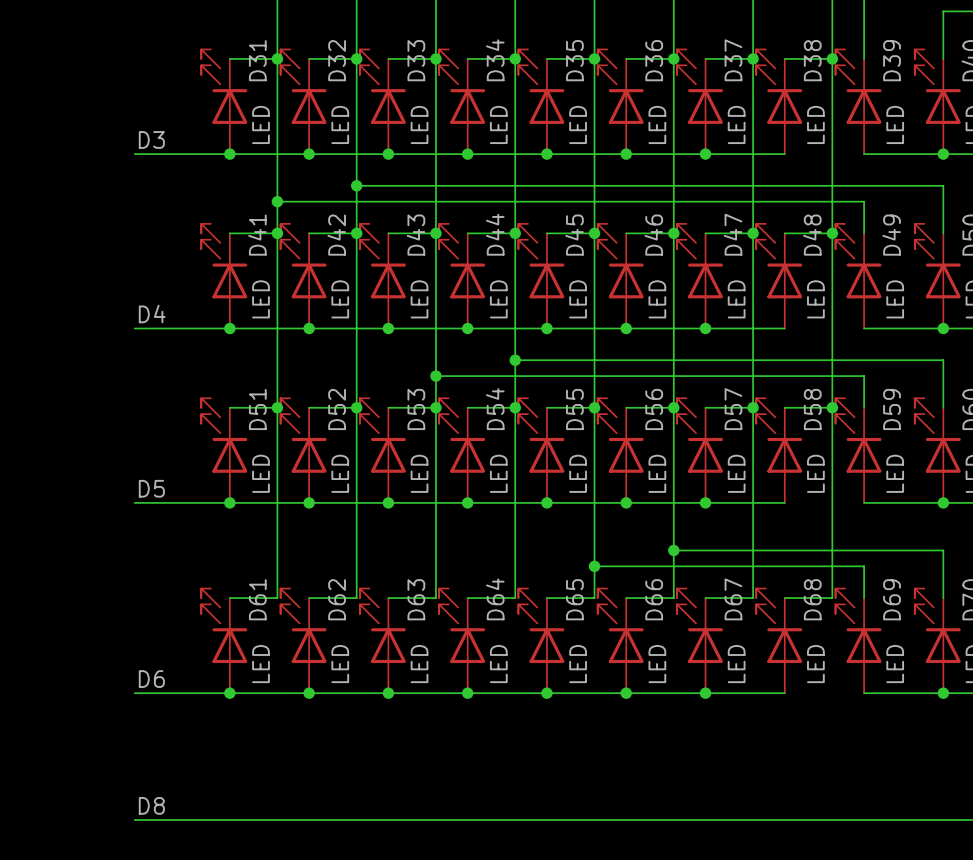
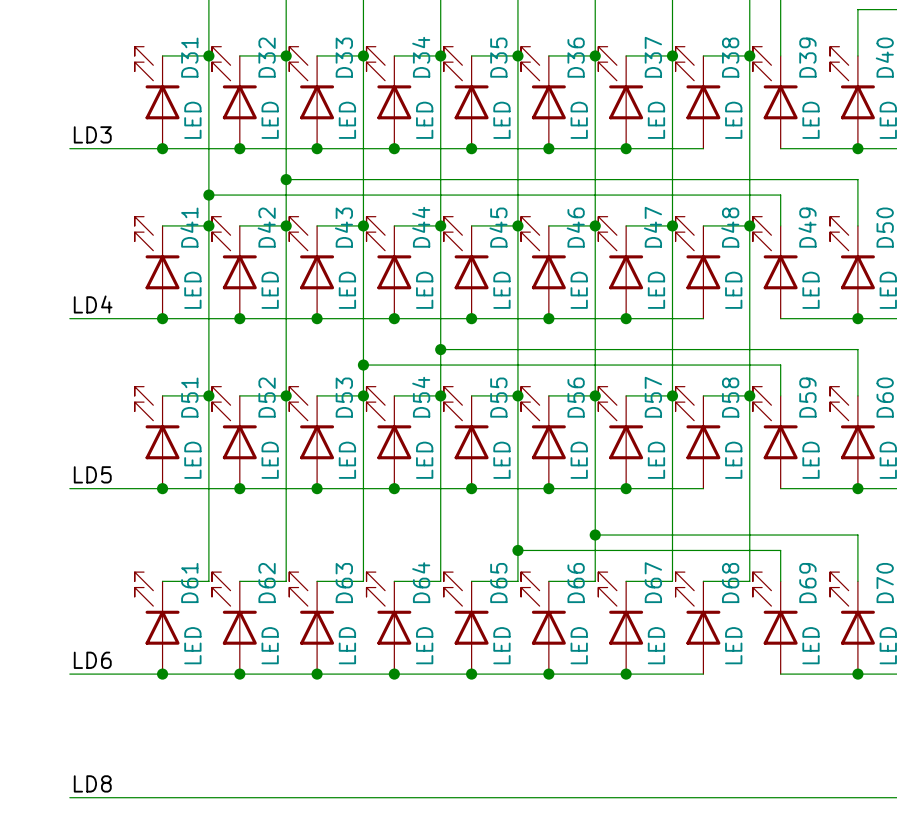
label: D3 (151, 139) -> LD3 (92, 134)
label: D4 (152, 313) -> LD4 (93, 304)
label: D5 (151, 488) -> LD5 (92, 474)
label: D6 (151, 679) -> LD6 (92, 660)
label: D8 (151, 805) -> LD8 (92, 783)

